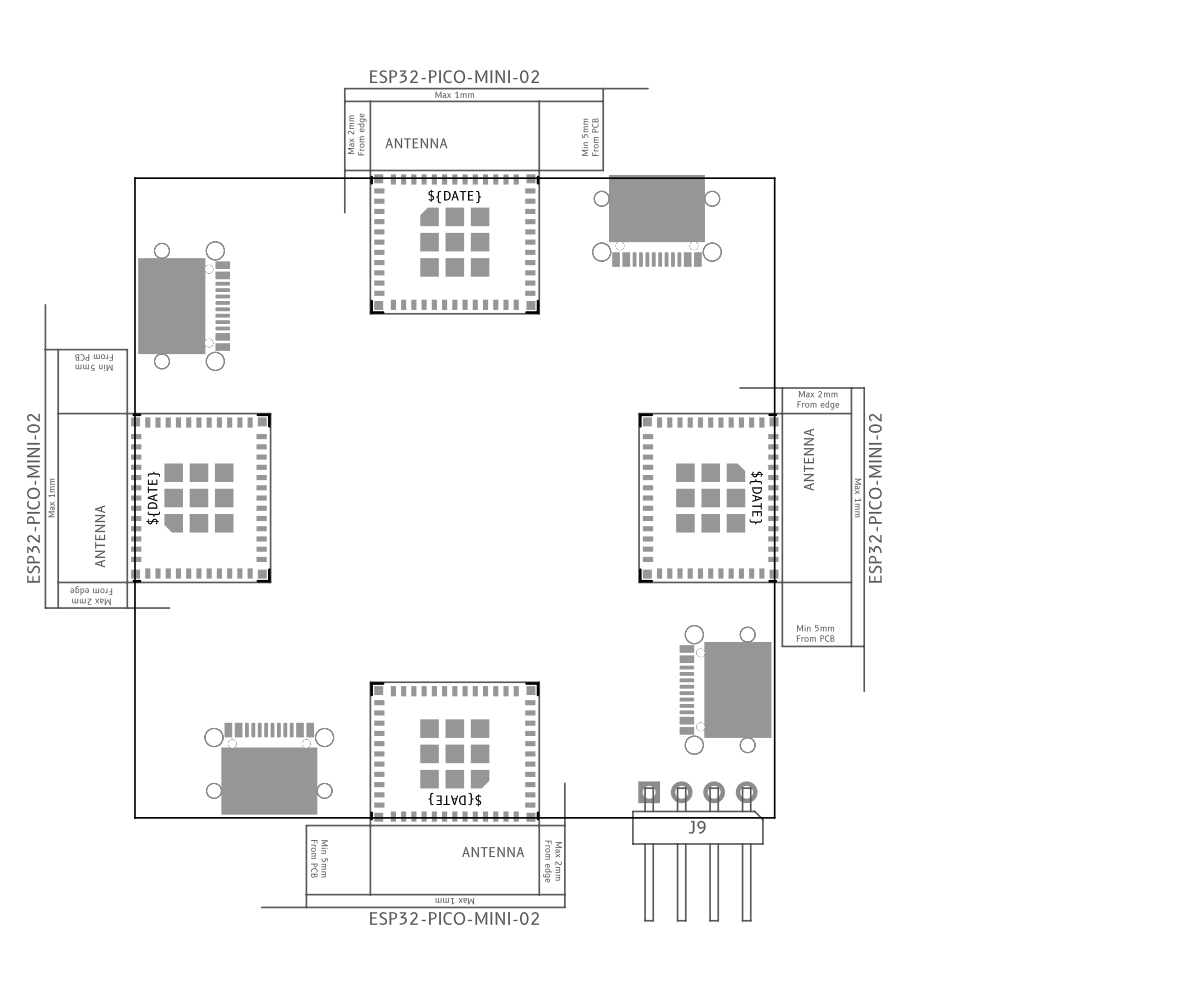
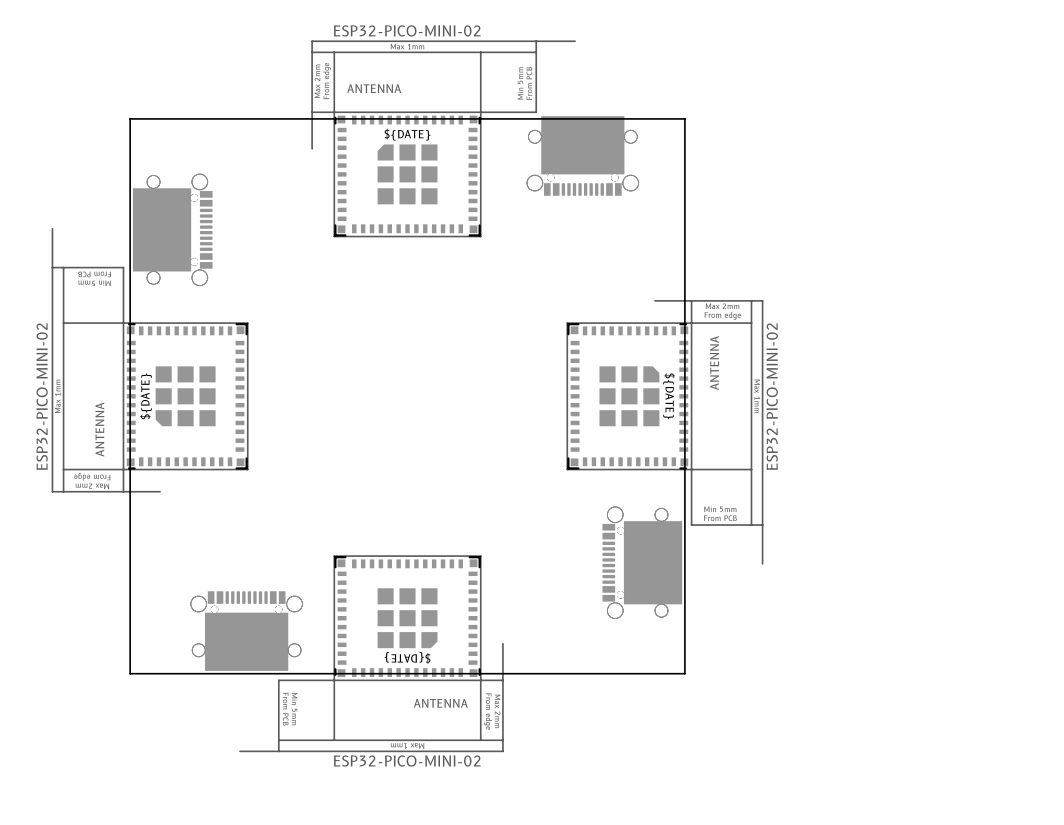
J9: (697, 851) -> none

